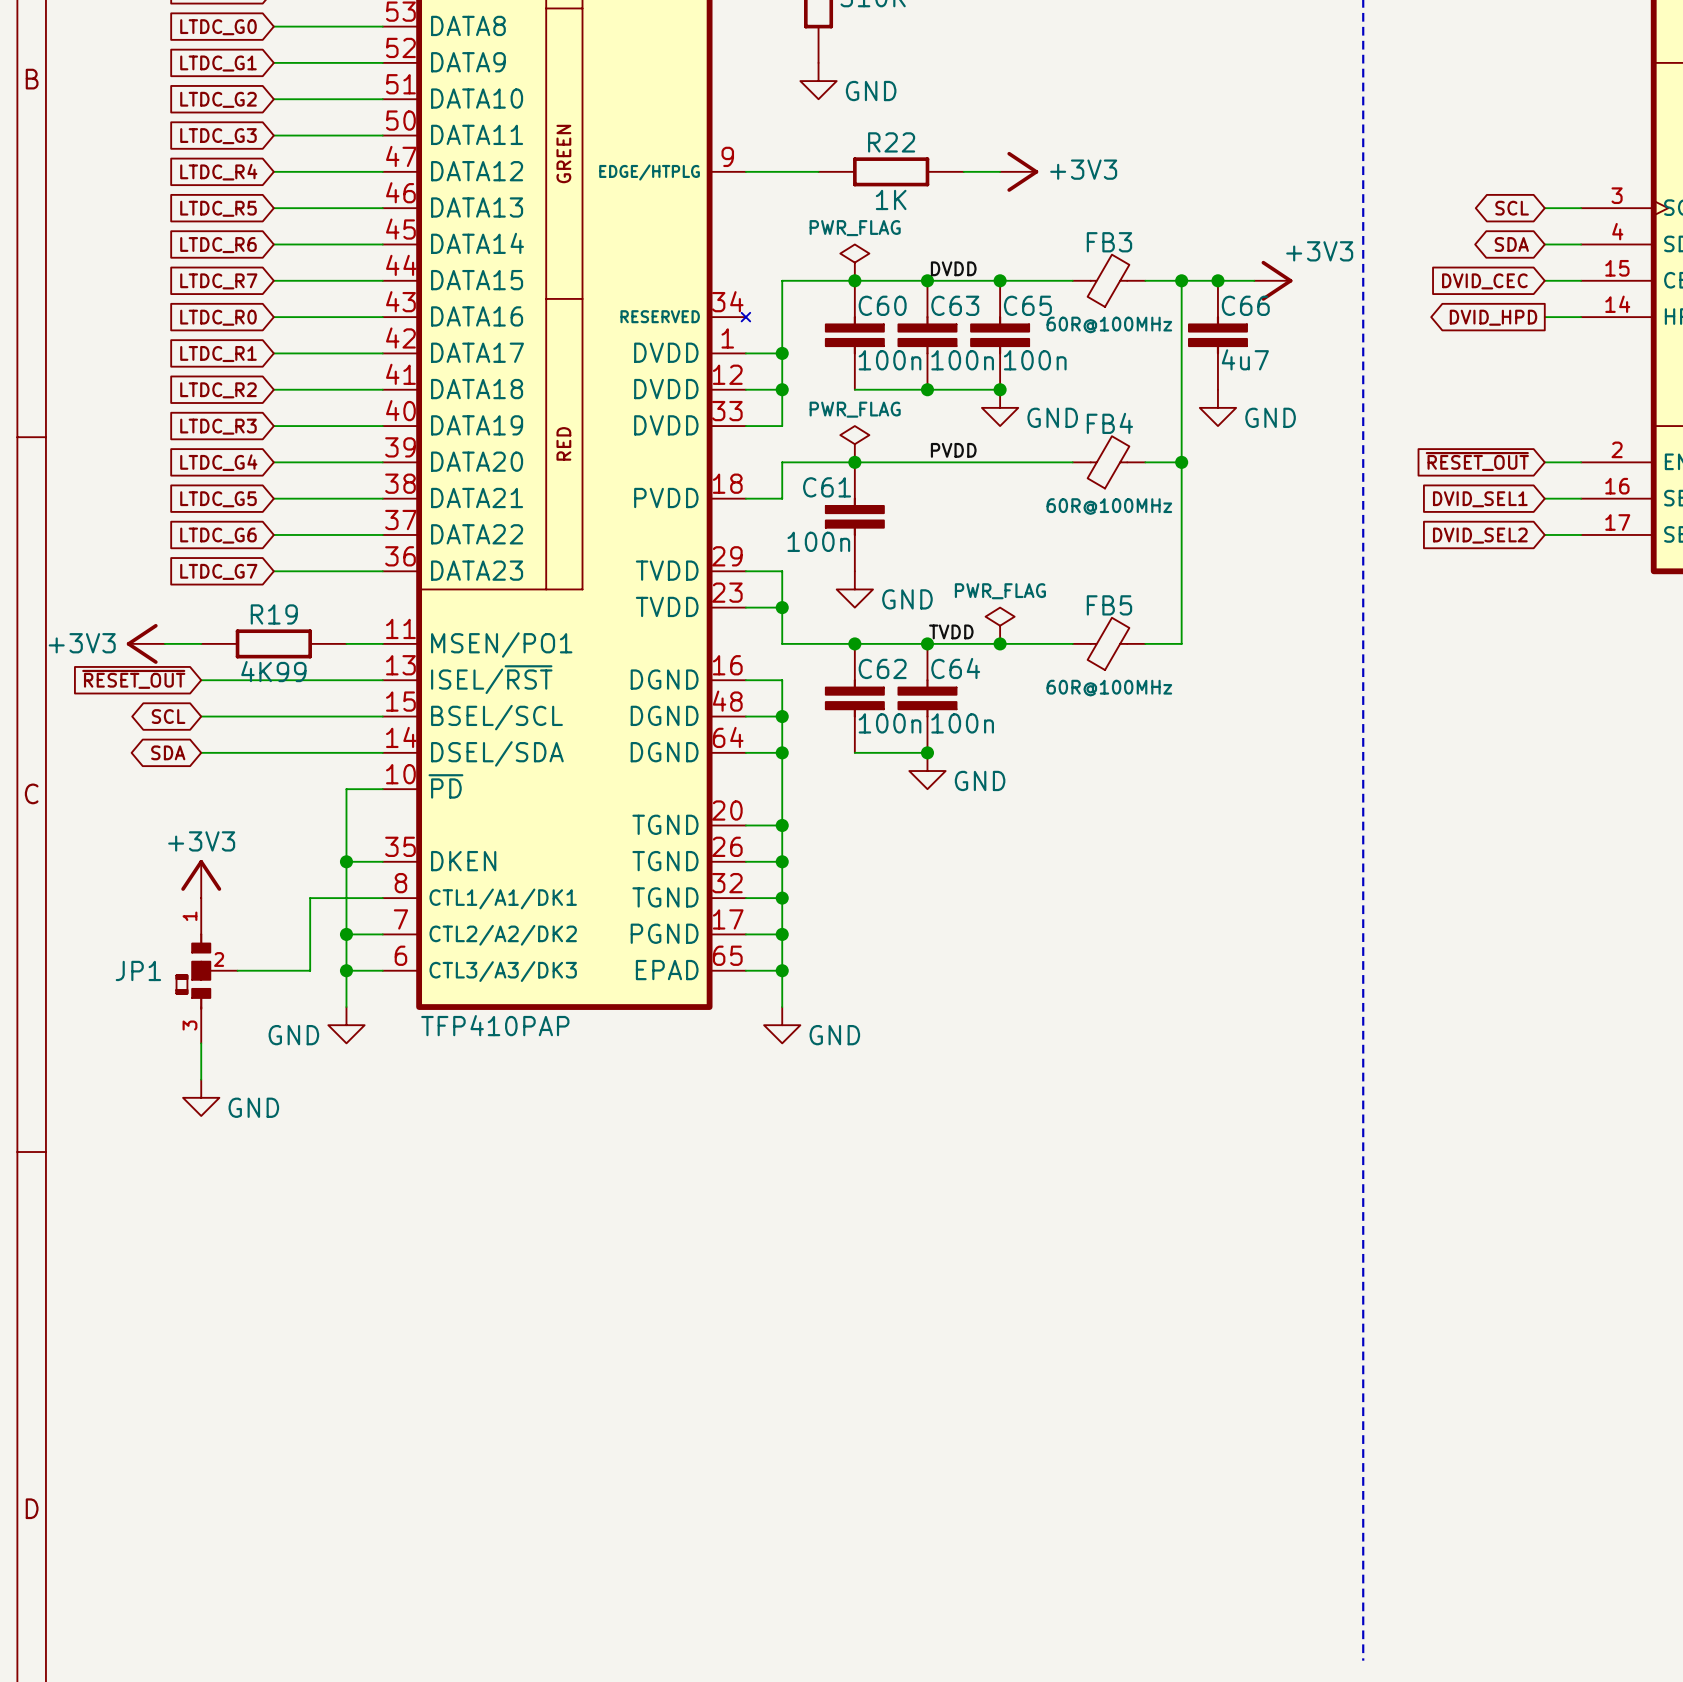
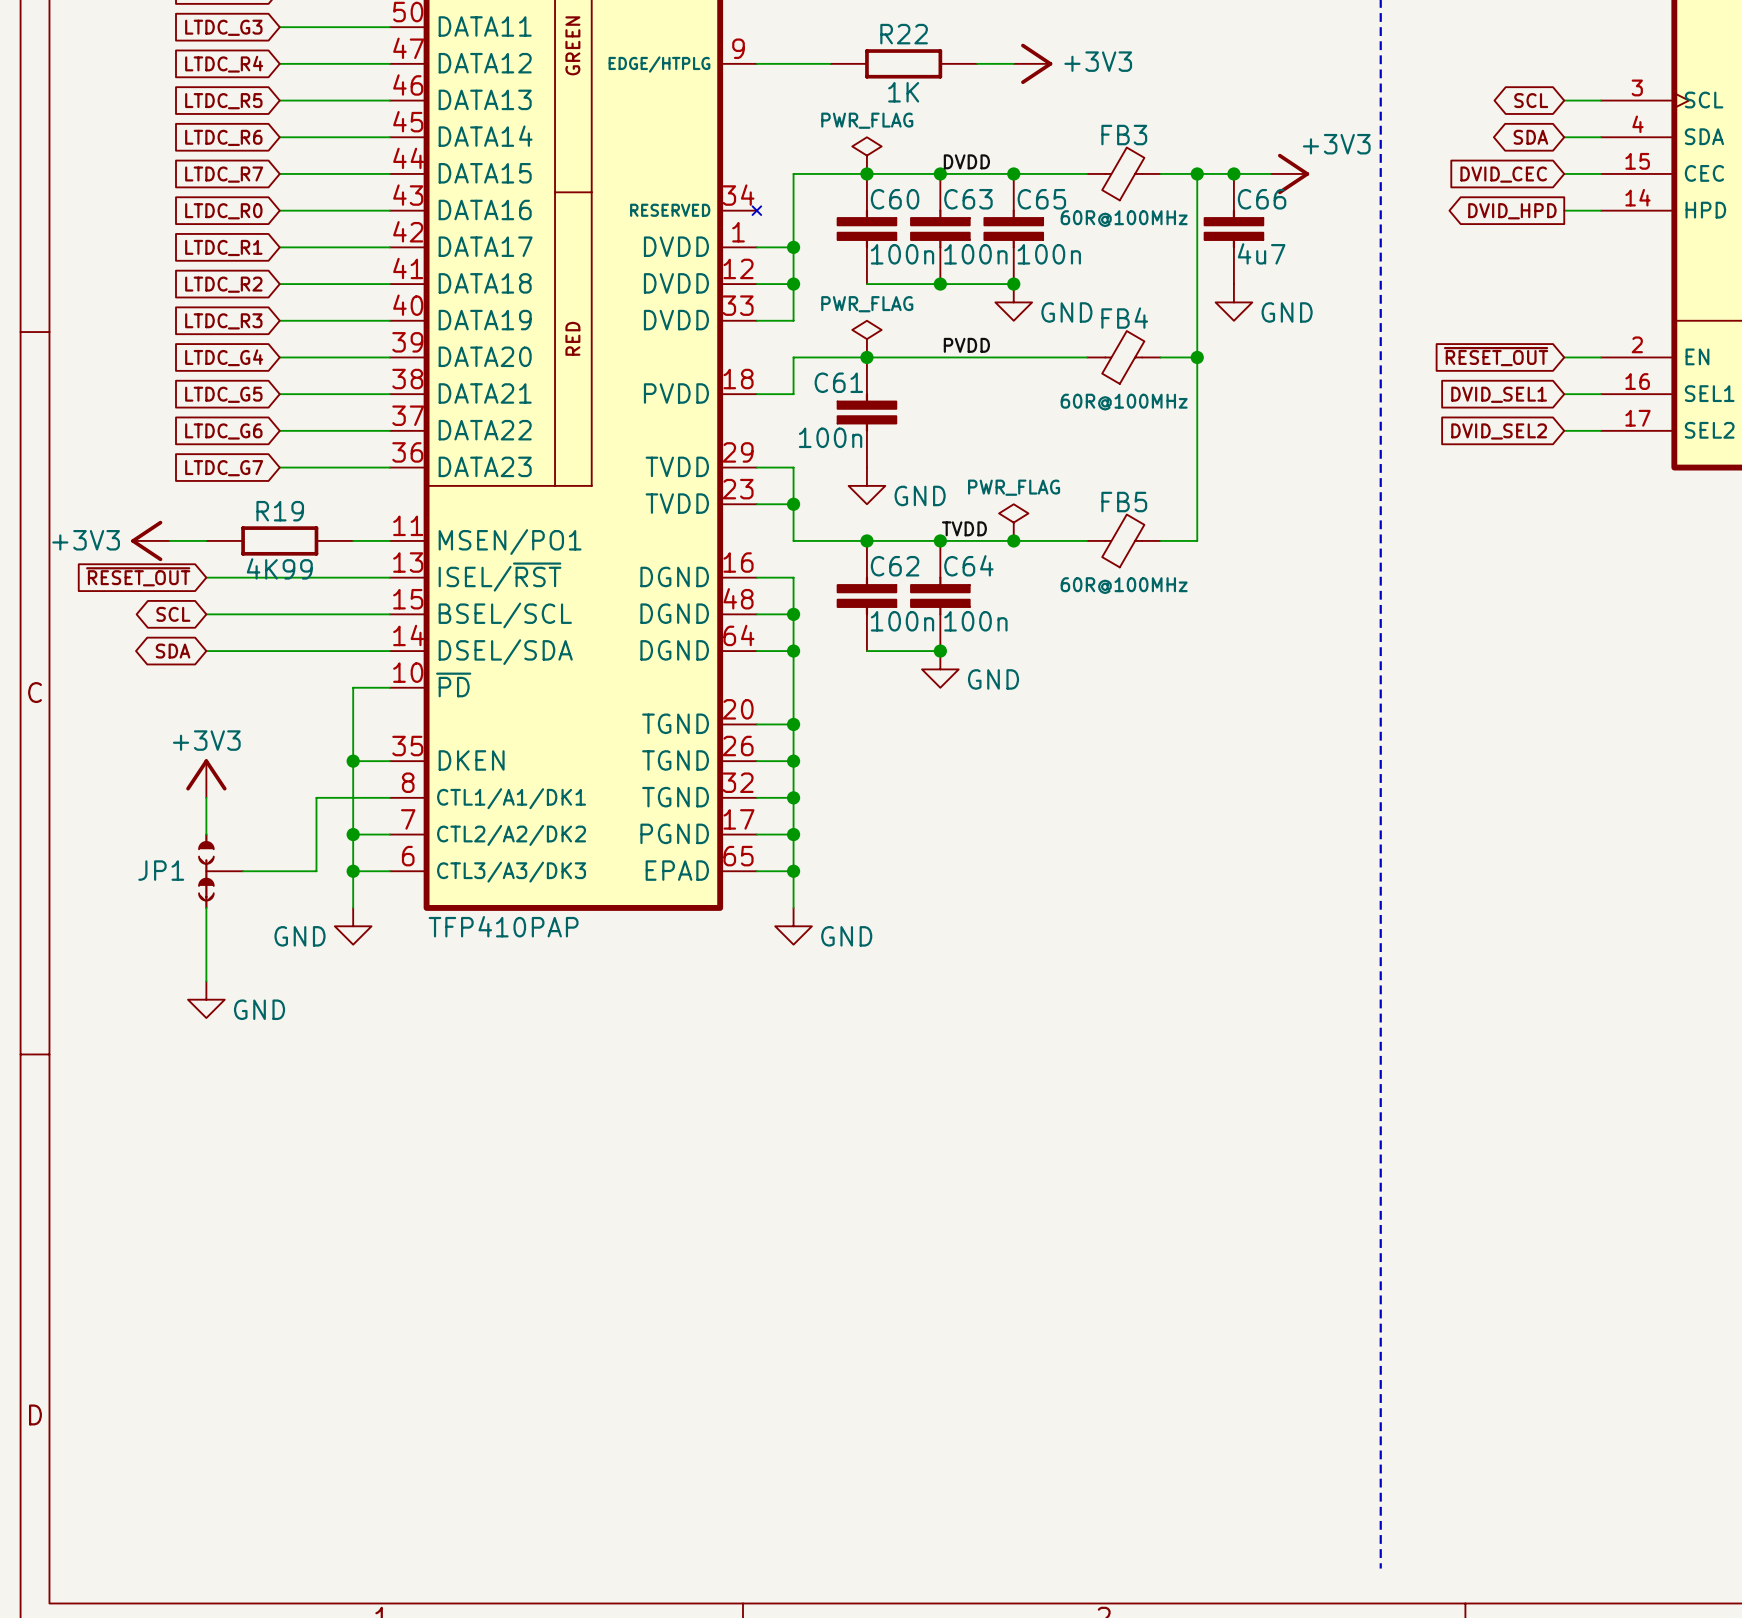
JP1 symbol: [176, 898, 238, 1044] -> [199, 833, 244, 910]

